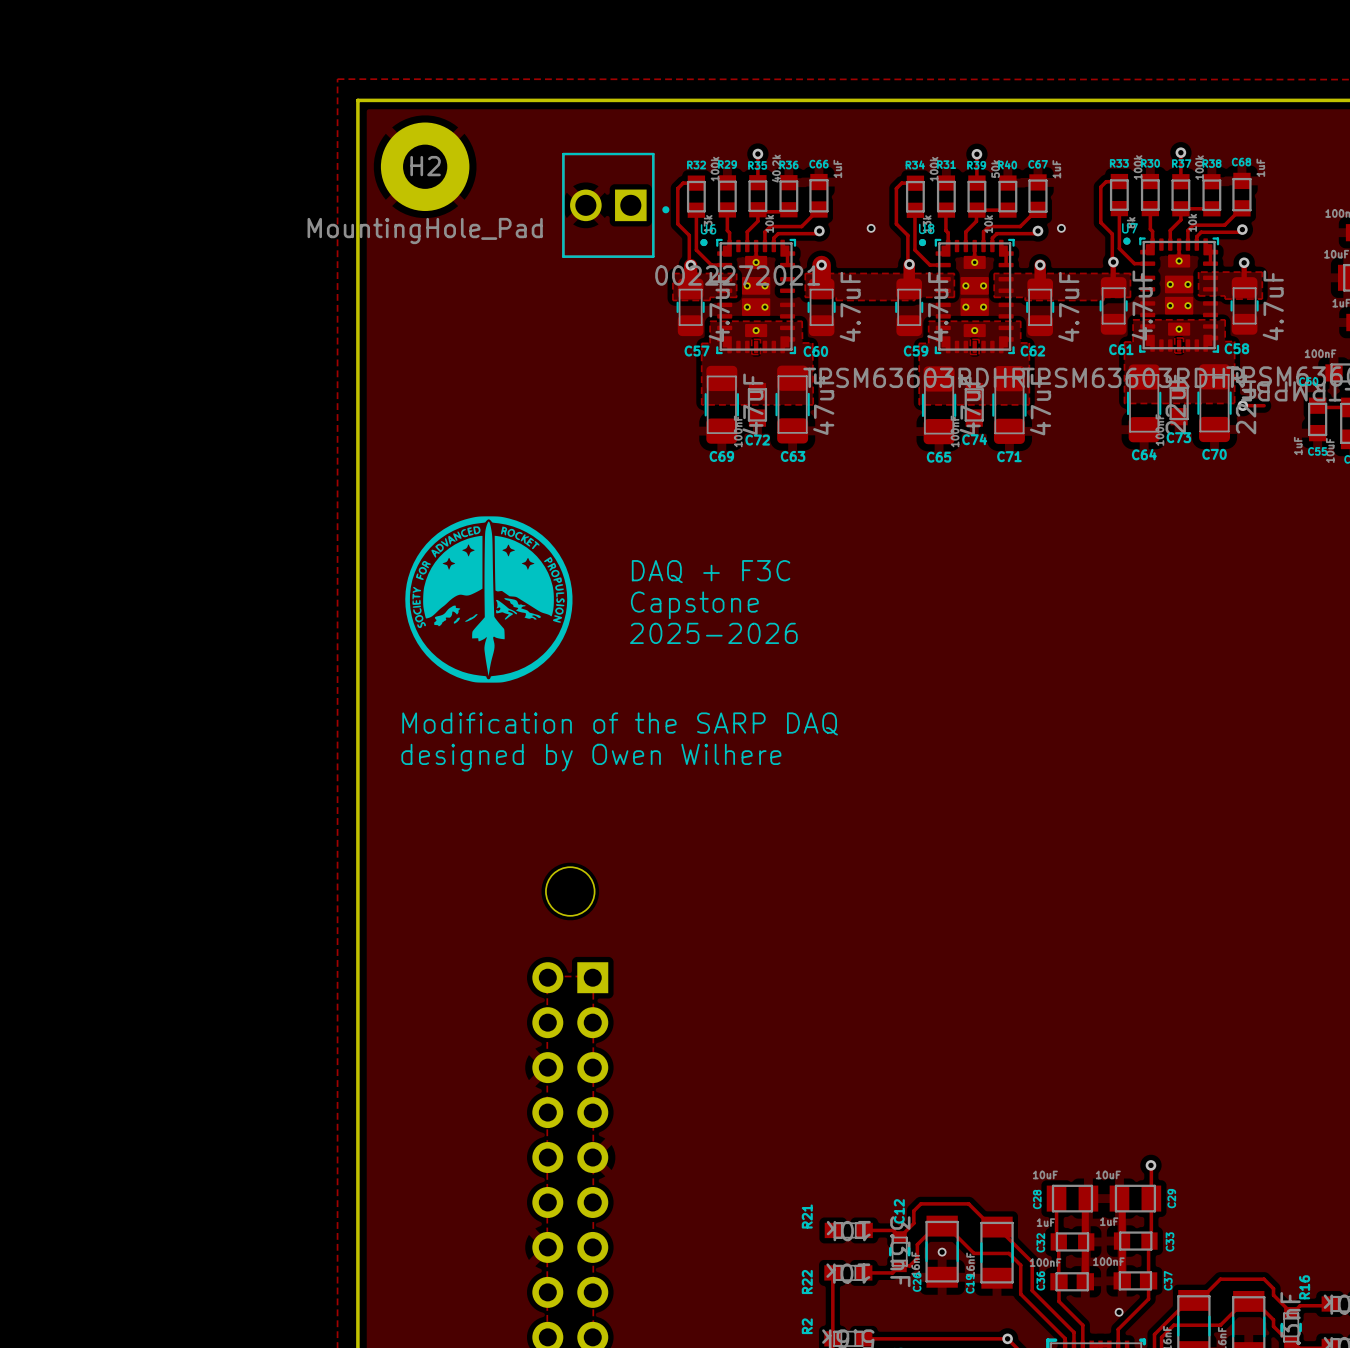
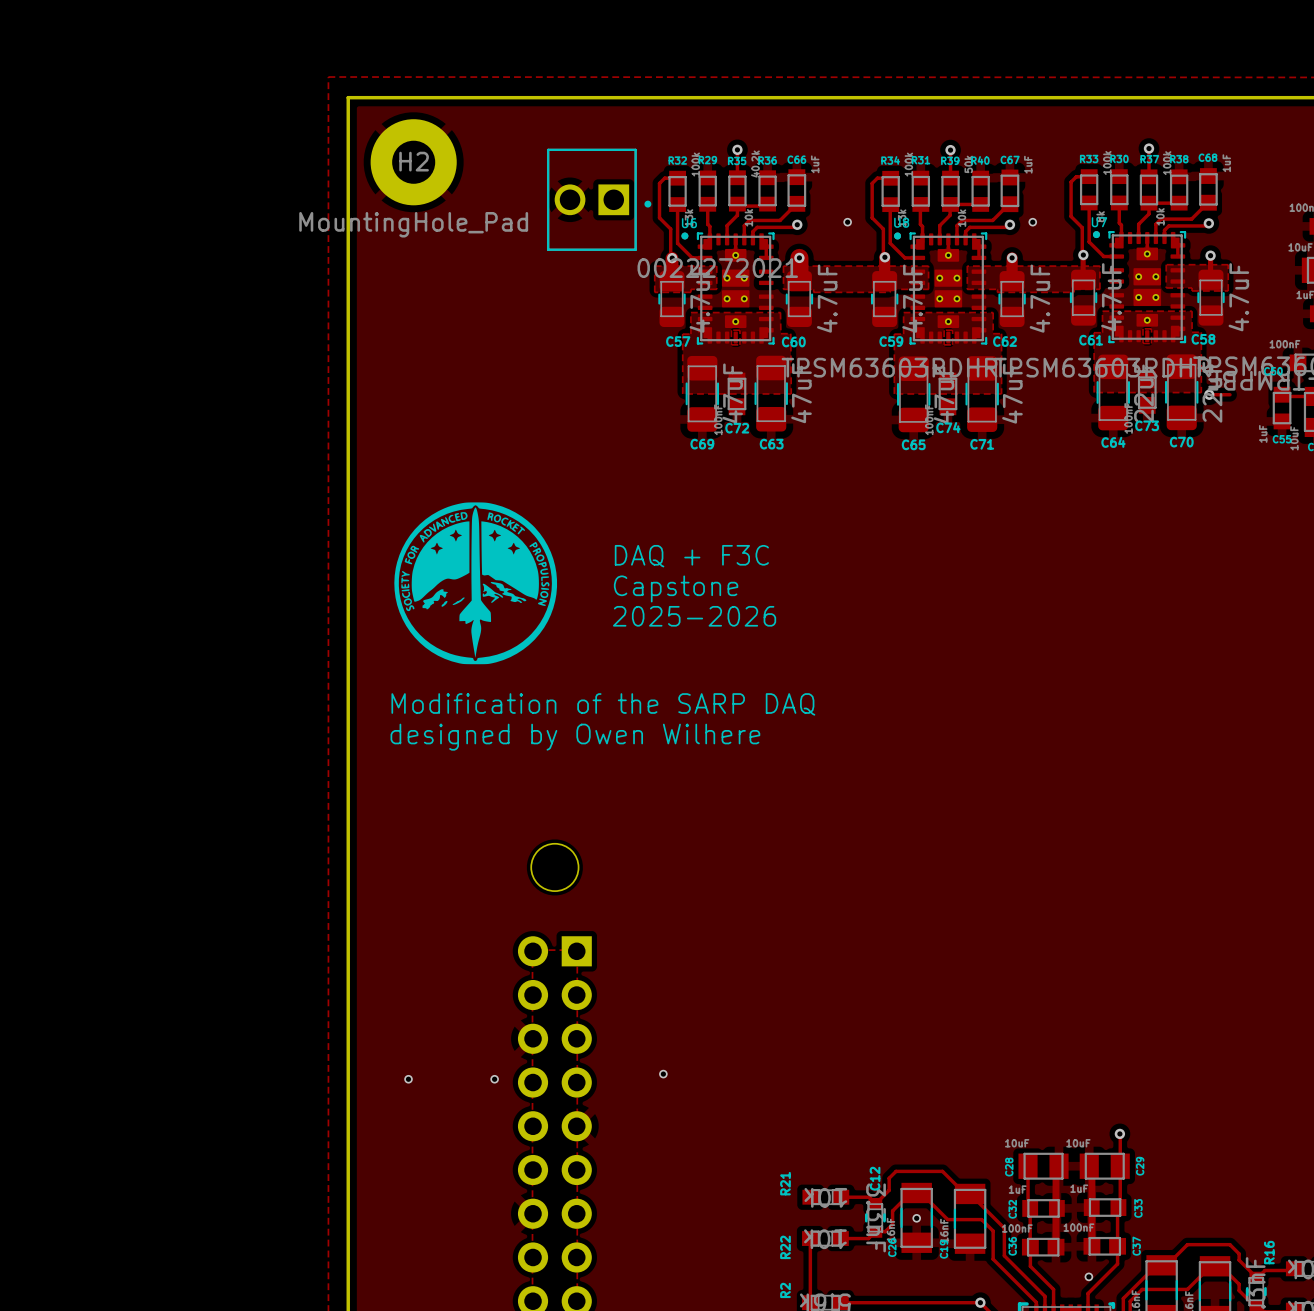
via: none -> (663, 1074)
via: none -> (408, 1079)
via: none -> (494, 1079)

